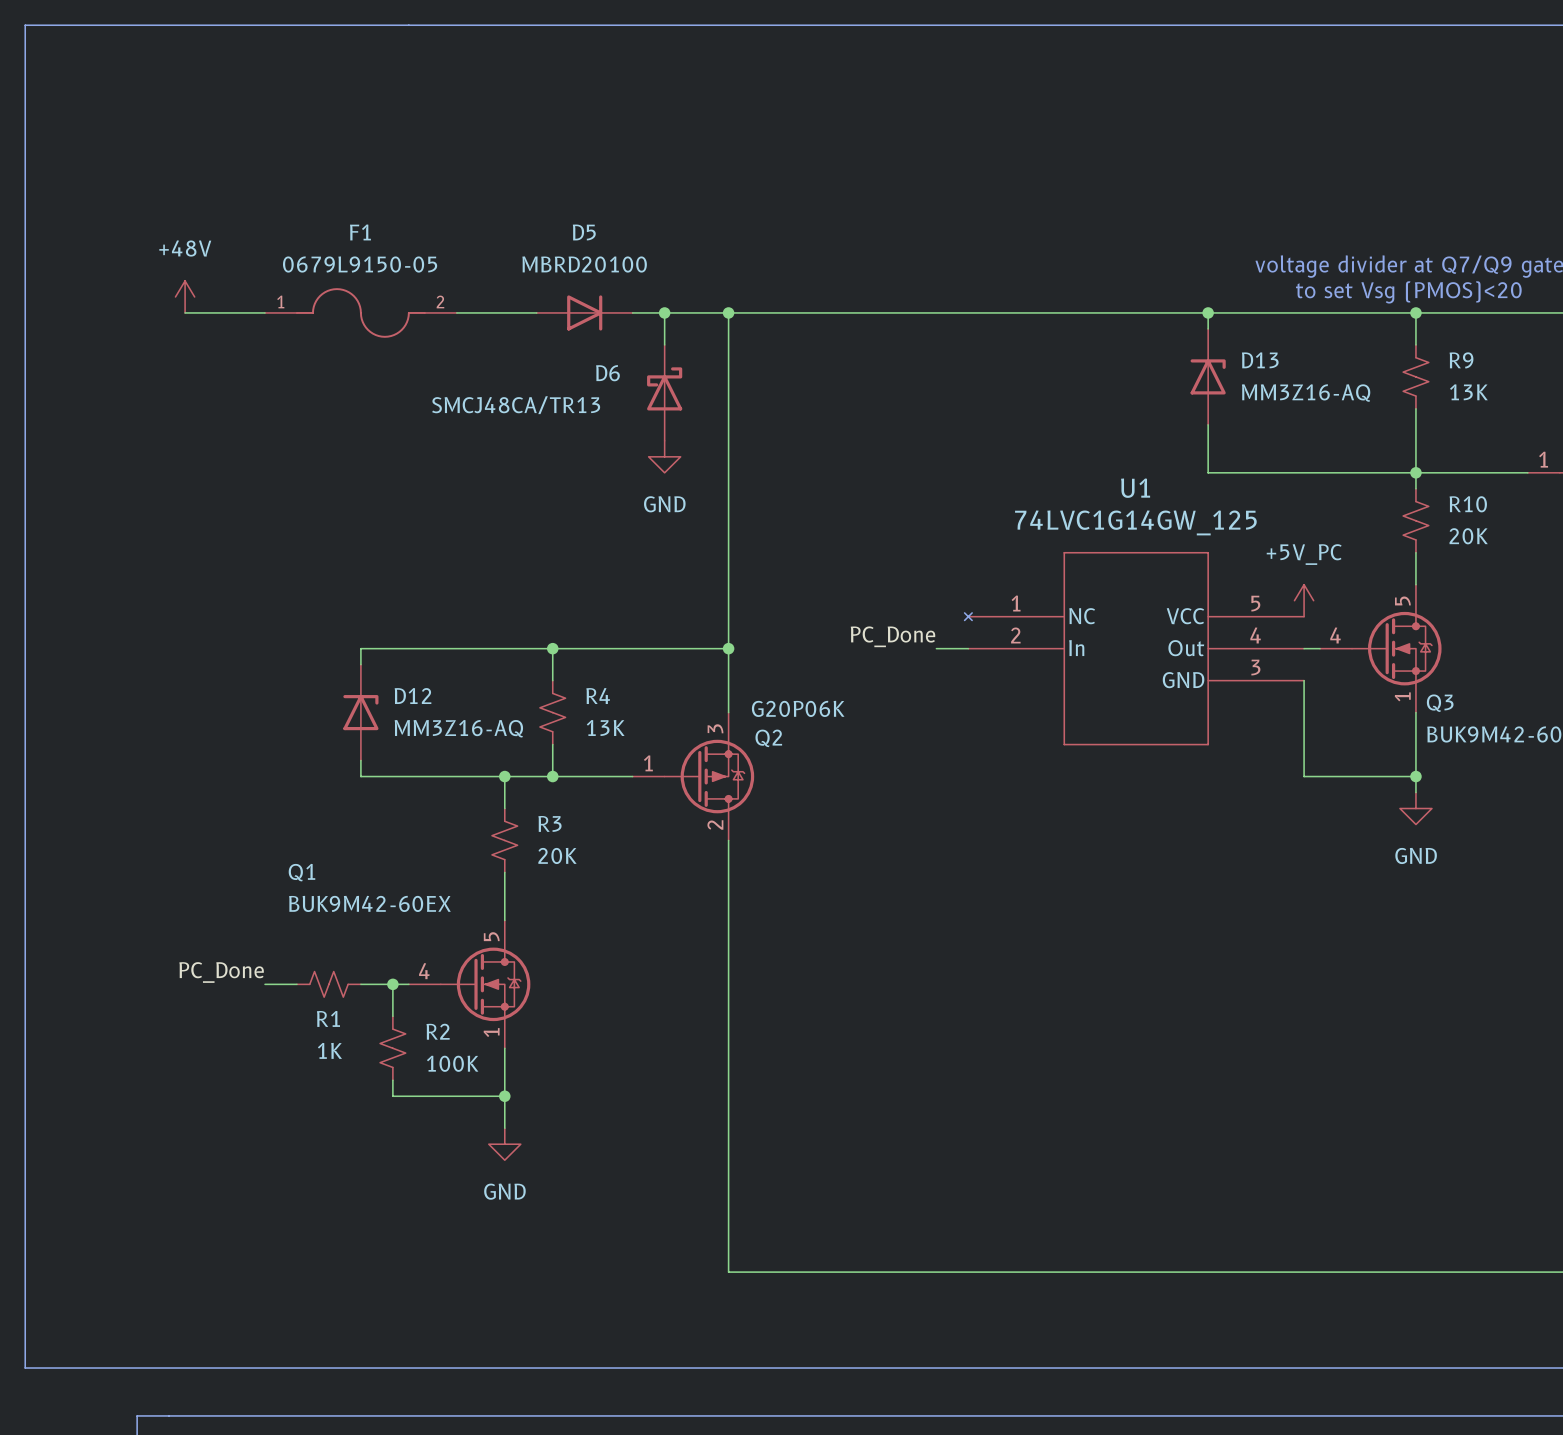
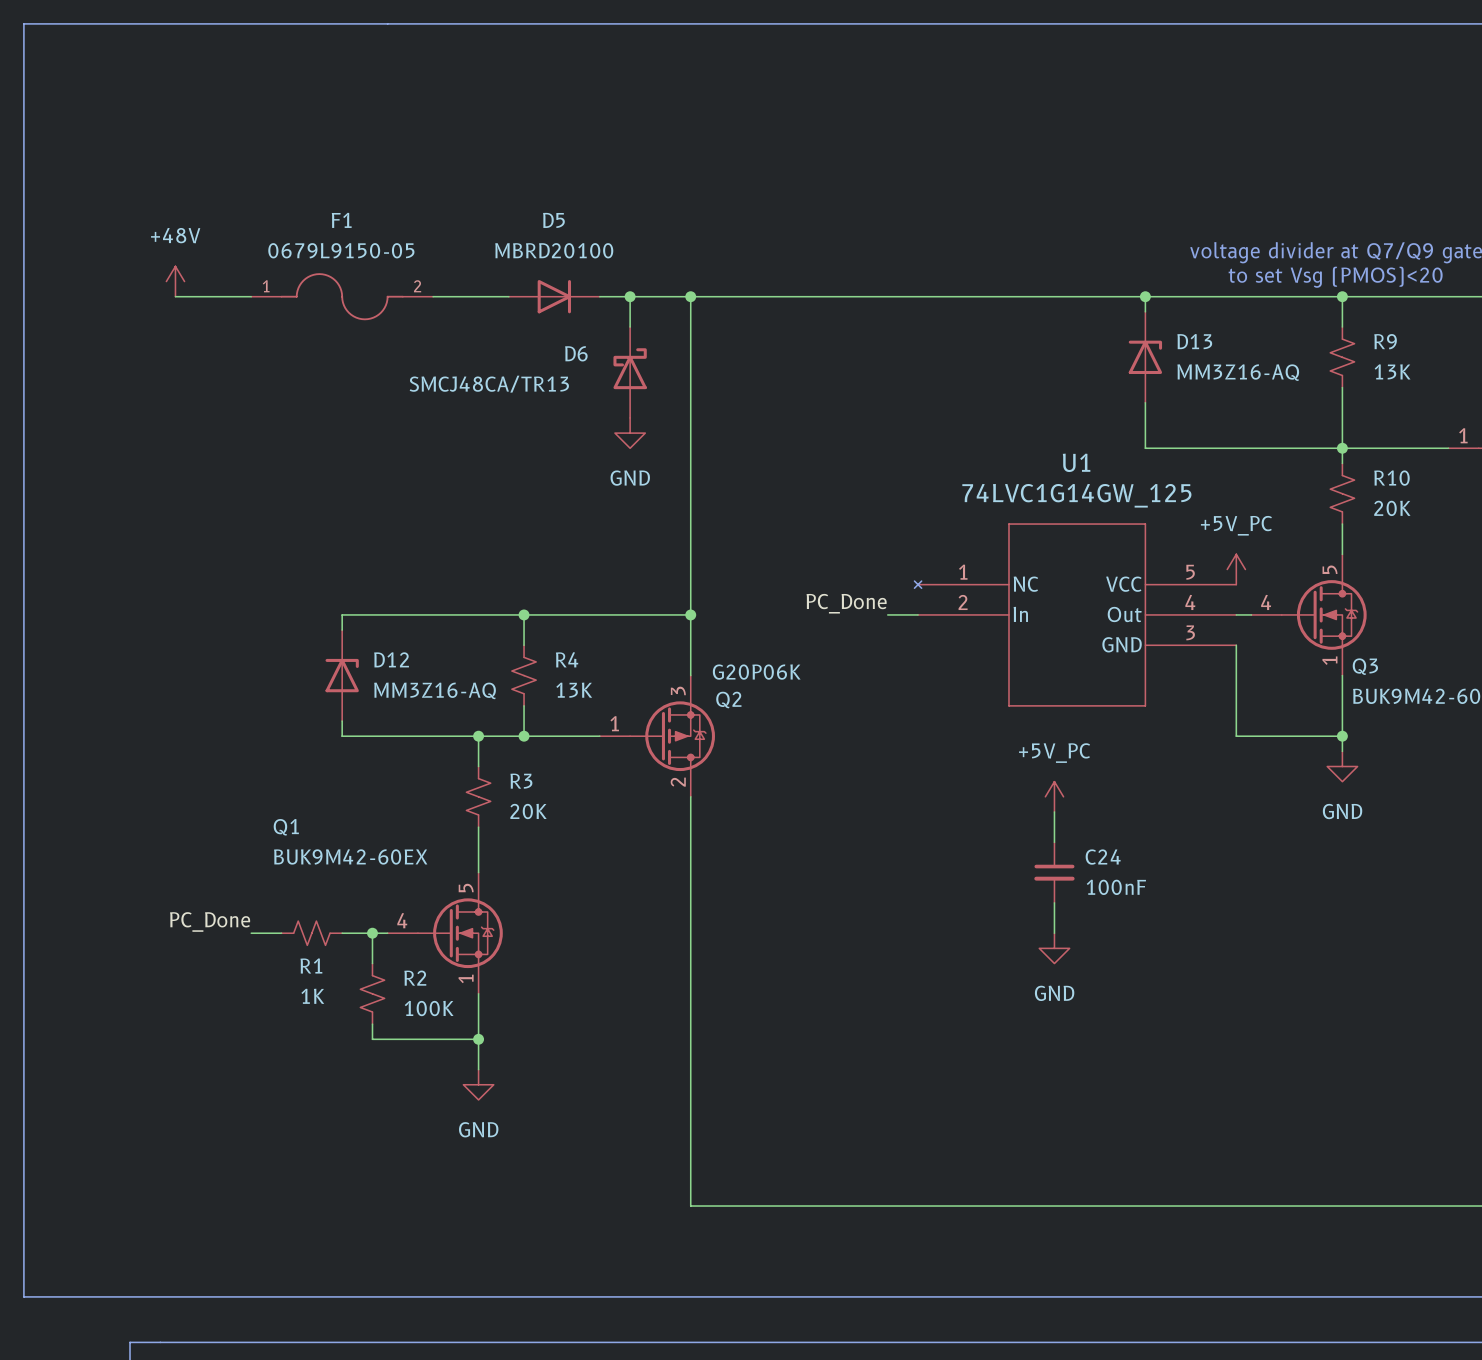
power symbol: none -> +5V_PC (1054, 796)
wire: none -> (1054, 811) (1054, 842)
C24: none -> 100nF (1054, 872)
wire: none -> (1054, 902) (1054, 933)
power symbol: none -> GND (1054, 948)

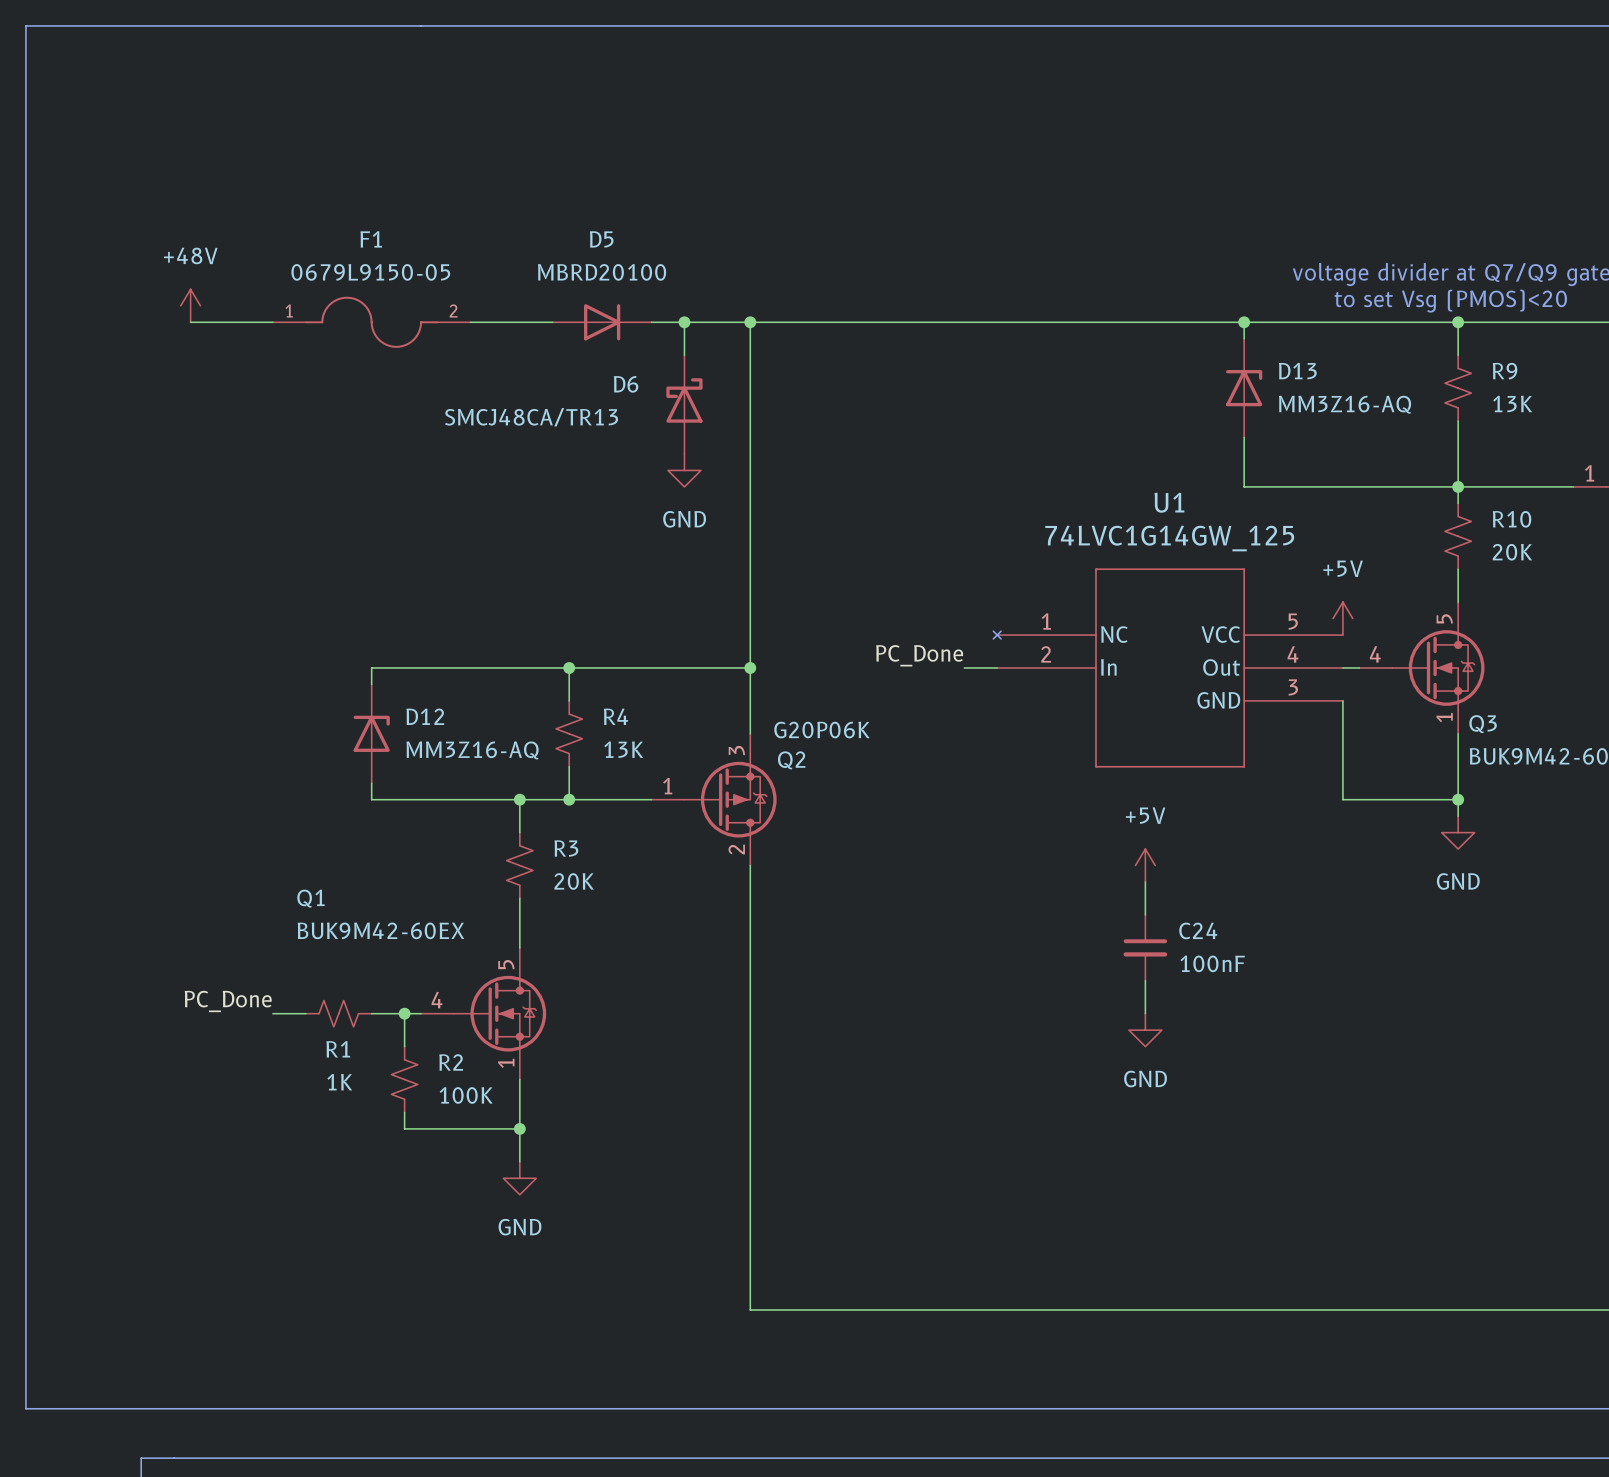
power symbol: +5V_PC (1236, 569) -> +5V (1342, 618)
power symbol: +5V_PC (1054, 796) -> +5V (1145, 865)

